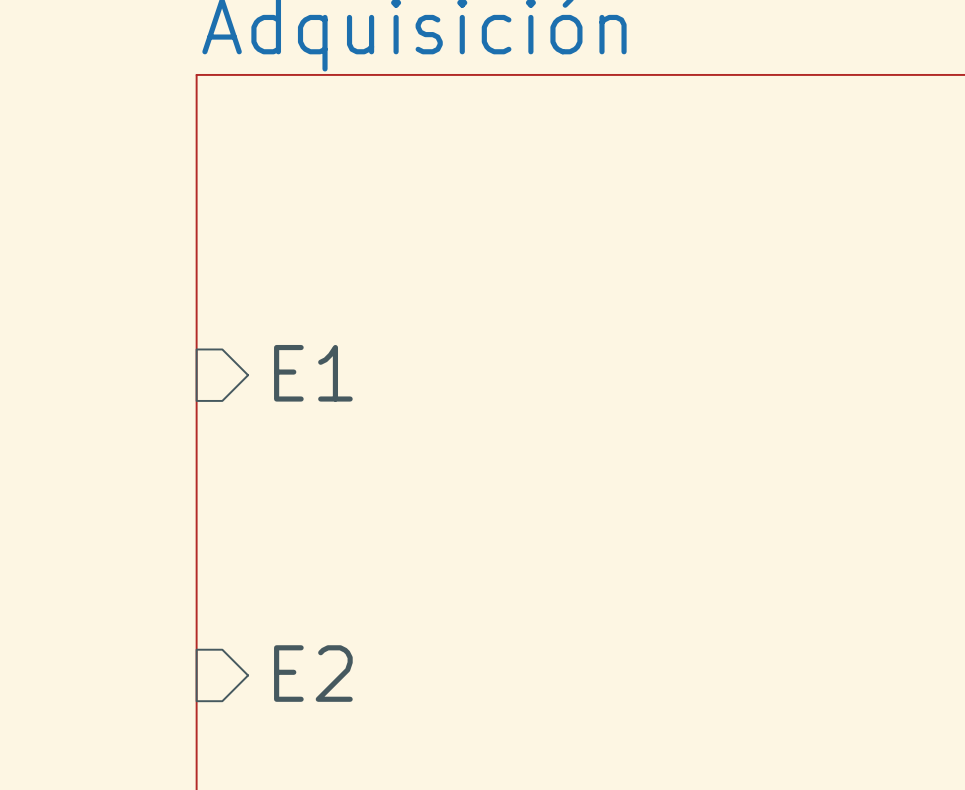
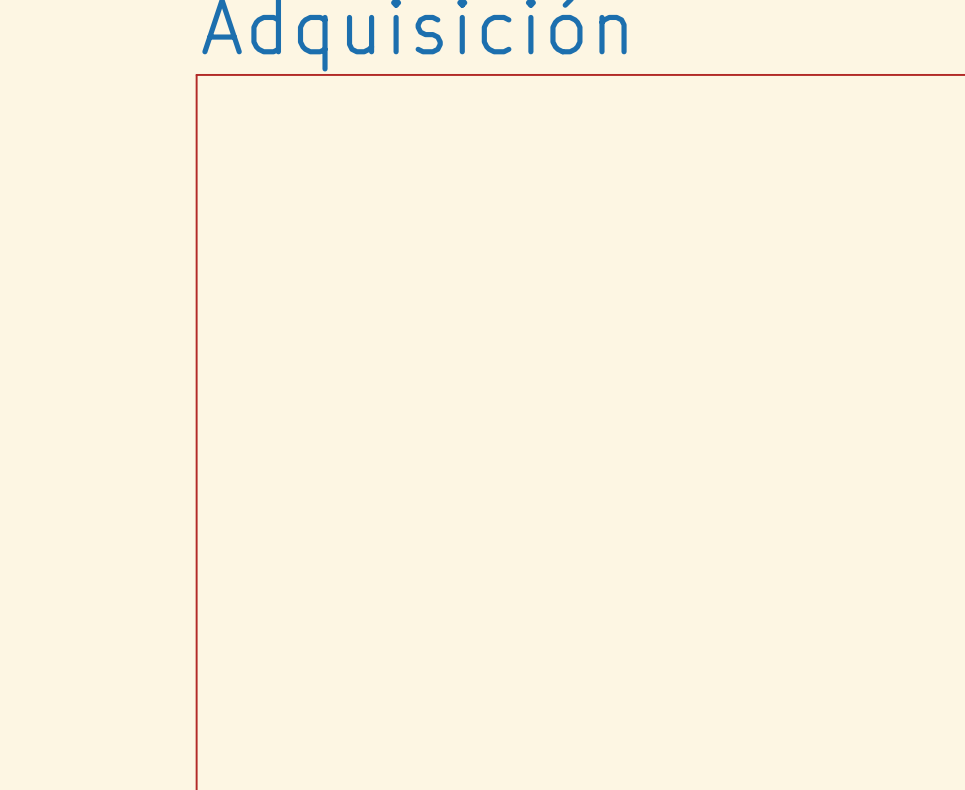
sheet pin: E1 (313, 373) -> none
sheet pin: E2 (313, 673) -> none

